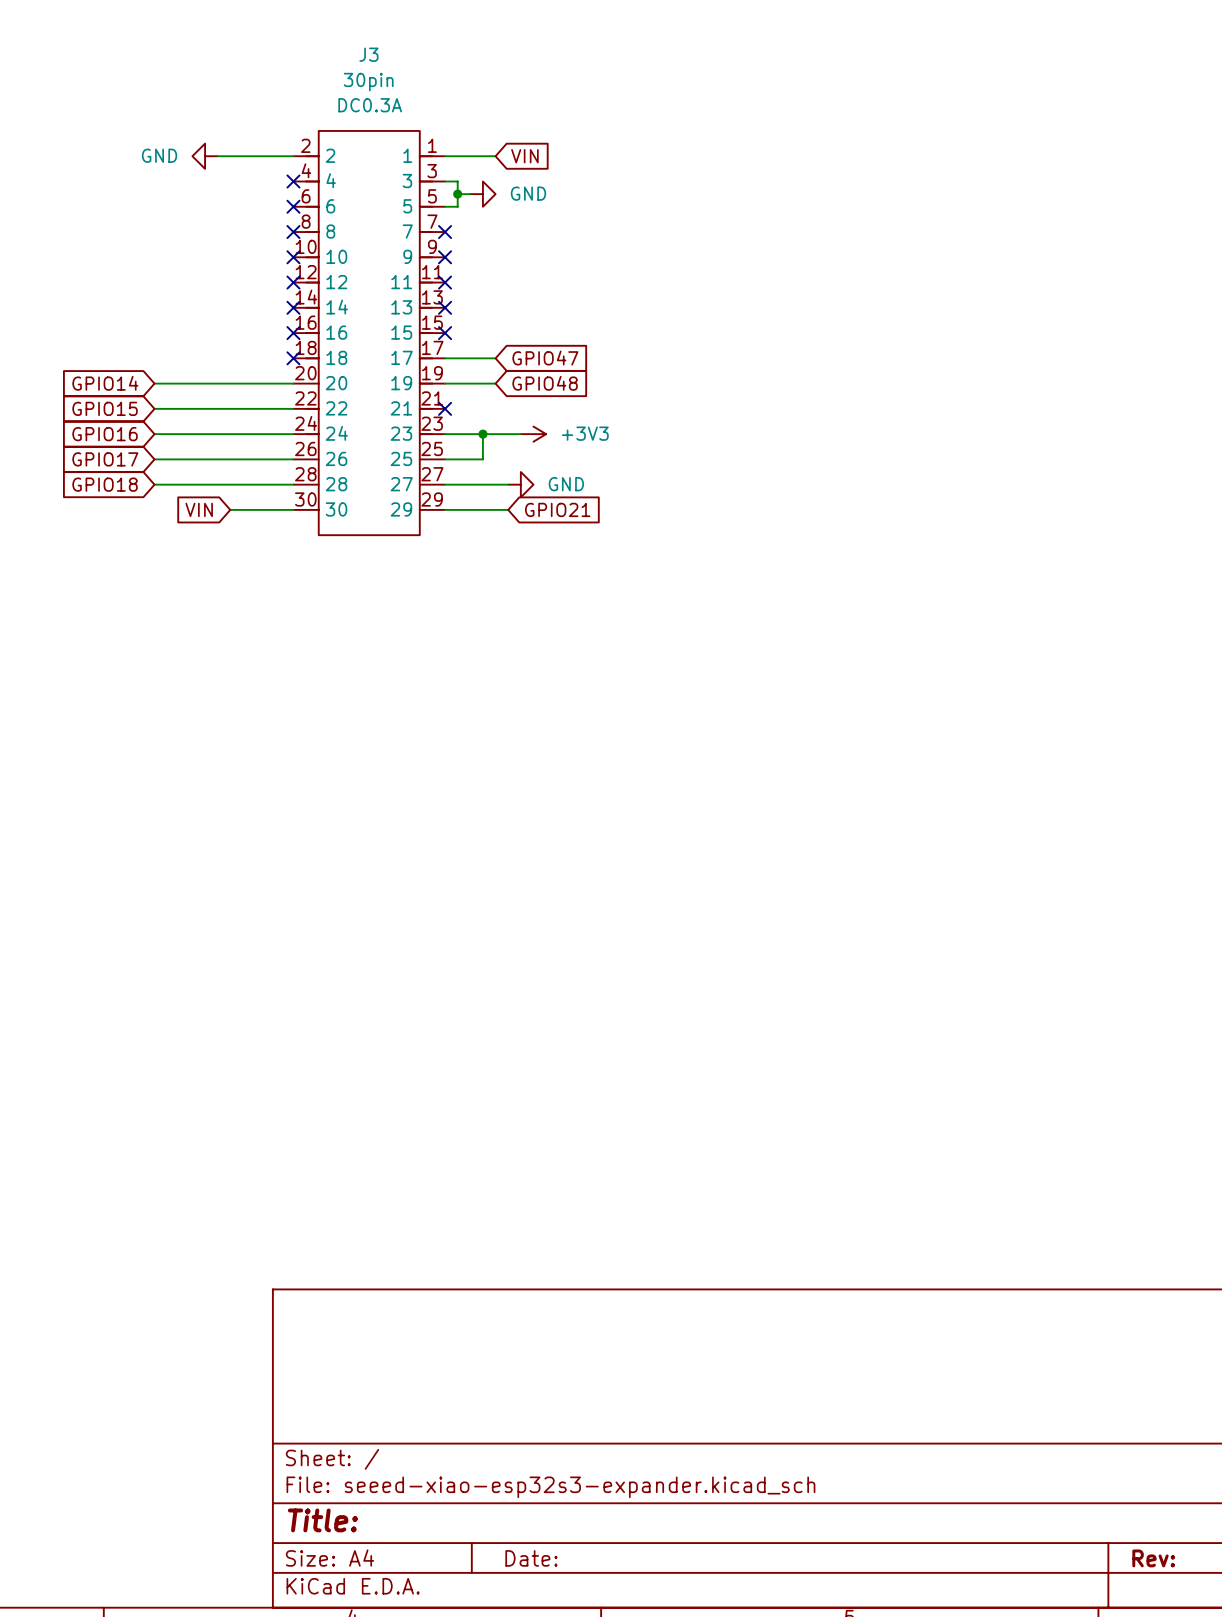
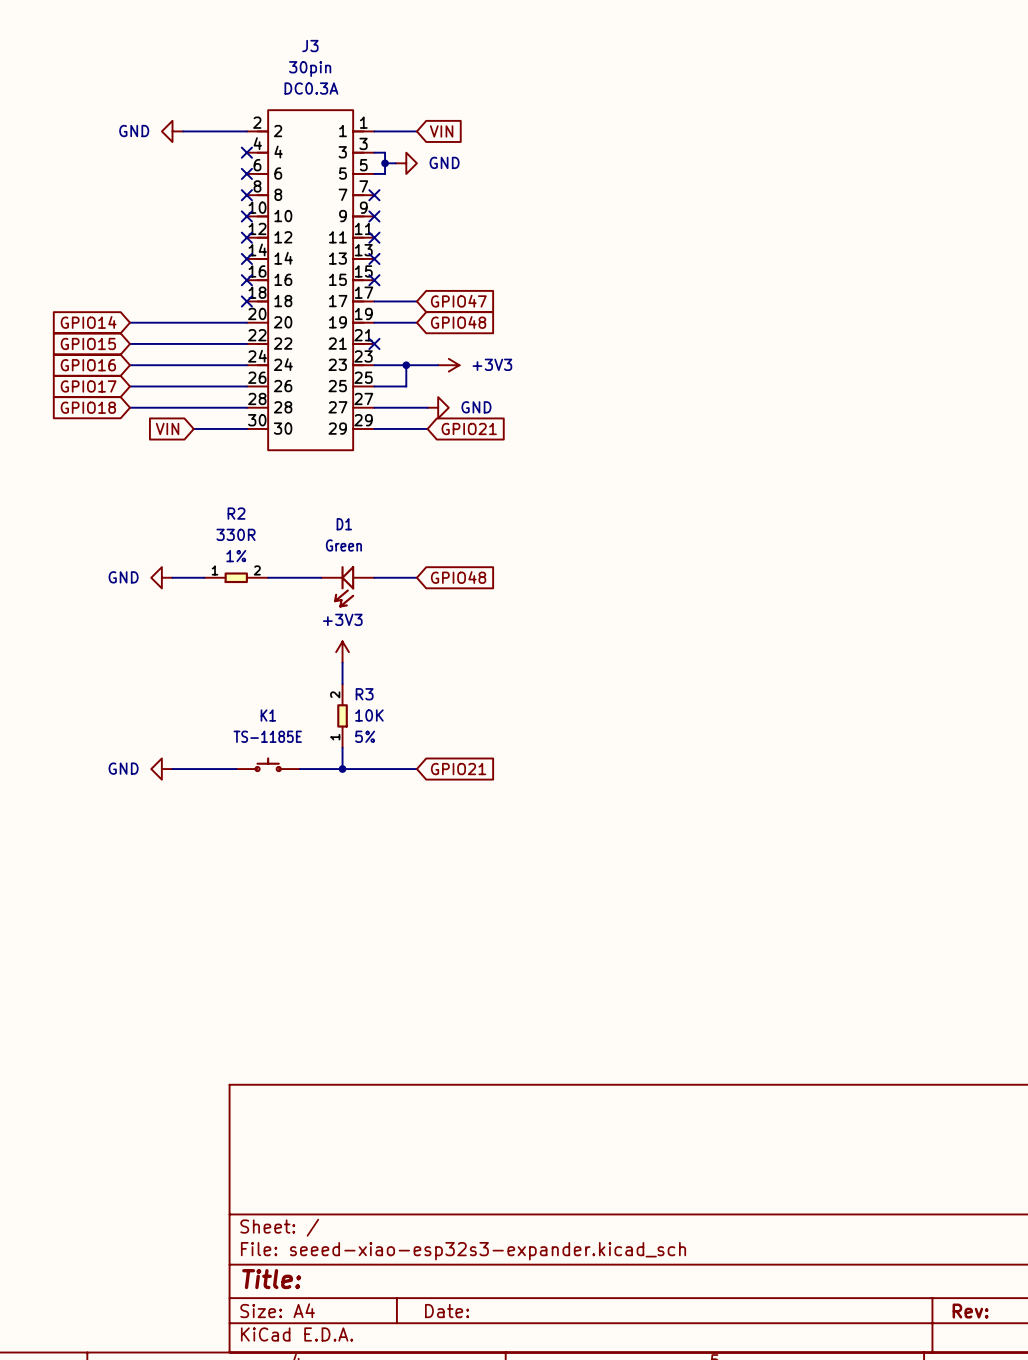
power symbol: none -> GND (161, 577)
wire: none -> (172, 577) (204, 577)
R2: none -> 330R (236, 577)
wire: none -> (268, 577) (321, 577)
wire: none -> (374, 577) (416, 577)
global label: none -> GPIO48 (458, 577)
D1: none -> Green (347, 586)
power symbol: none -> +3V3 (342, 652)
wire: none -> (342, 662) (342, 684)
R3: none -> 10K (342, 715)
wire: none -> (342, 747) (342, 769)
K1: none -> TS-1185E (268, 764)
power symbol: none -> GND (161, 769)
wire: none -> (172, 769) (236, 769)
wire: none -> (300, 769) (416, 769)
junction: none -> (342, 769)
global label: none -> GPIO21 (458, 769)

